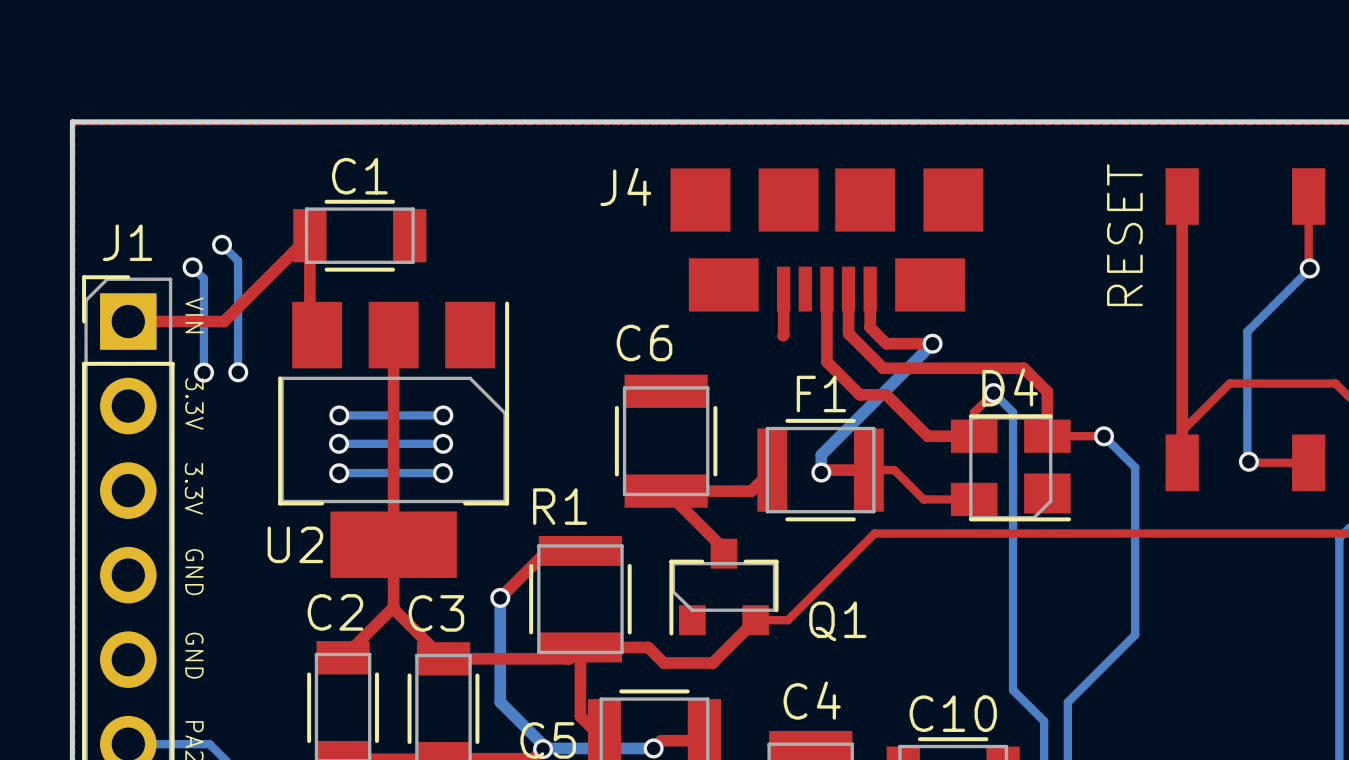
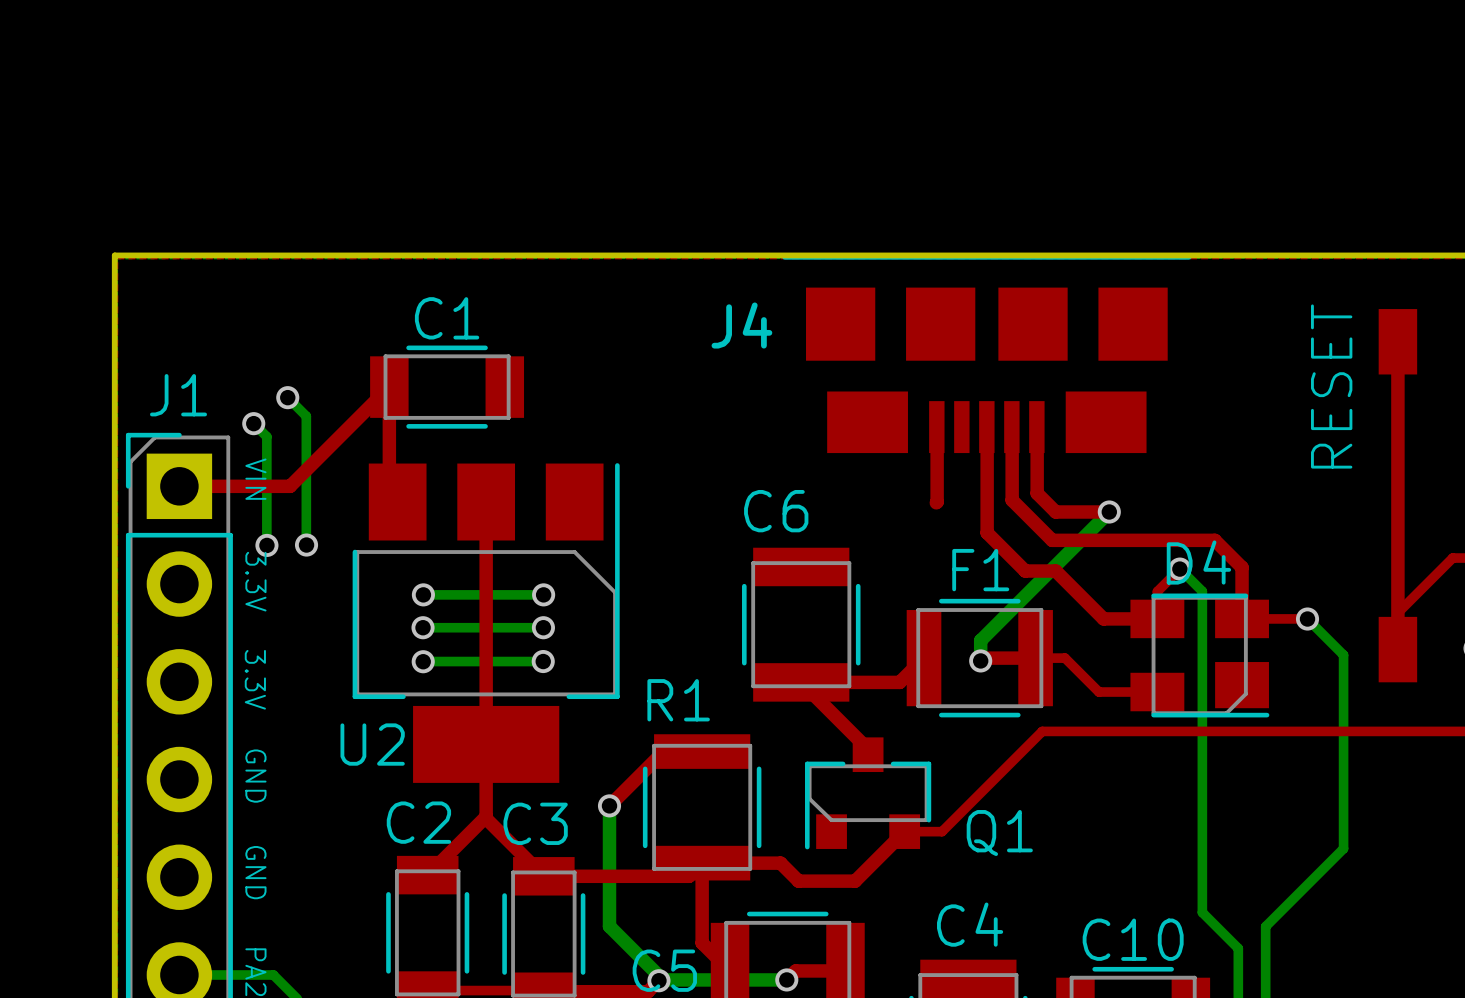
J4 footprint: [670, 168, 984, 312] -> [781, 253, 1192, 454]

